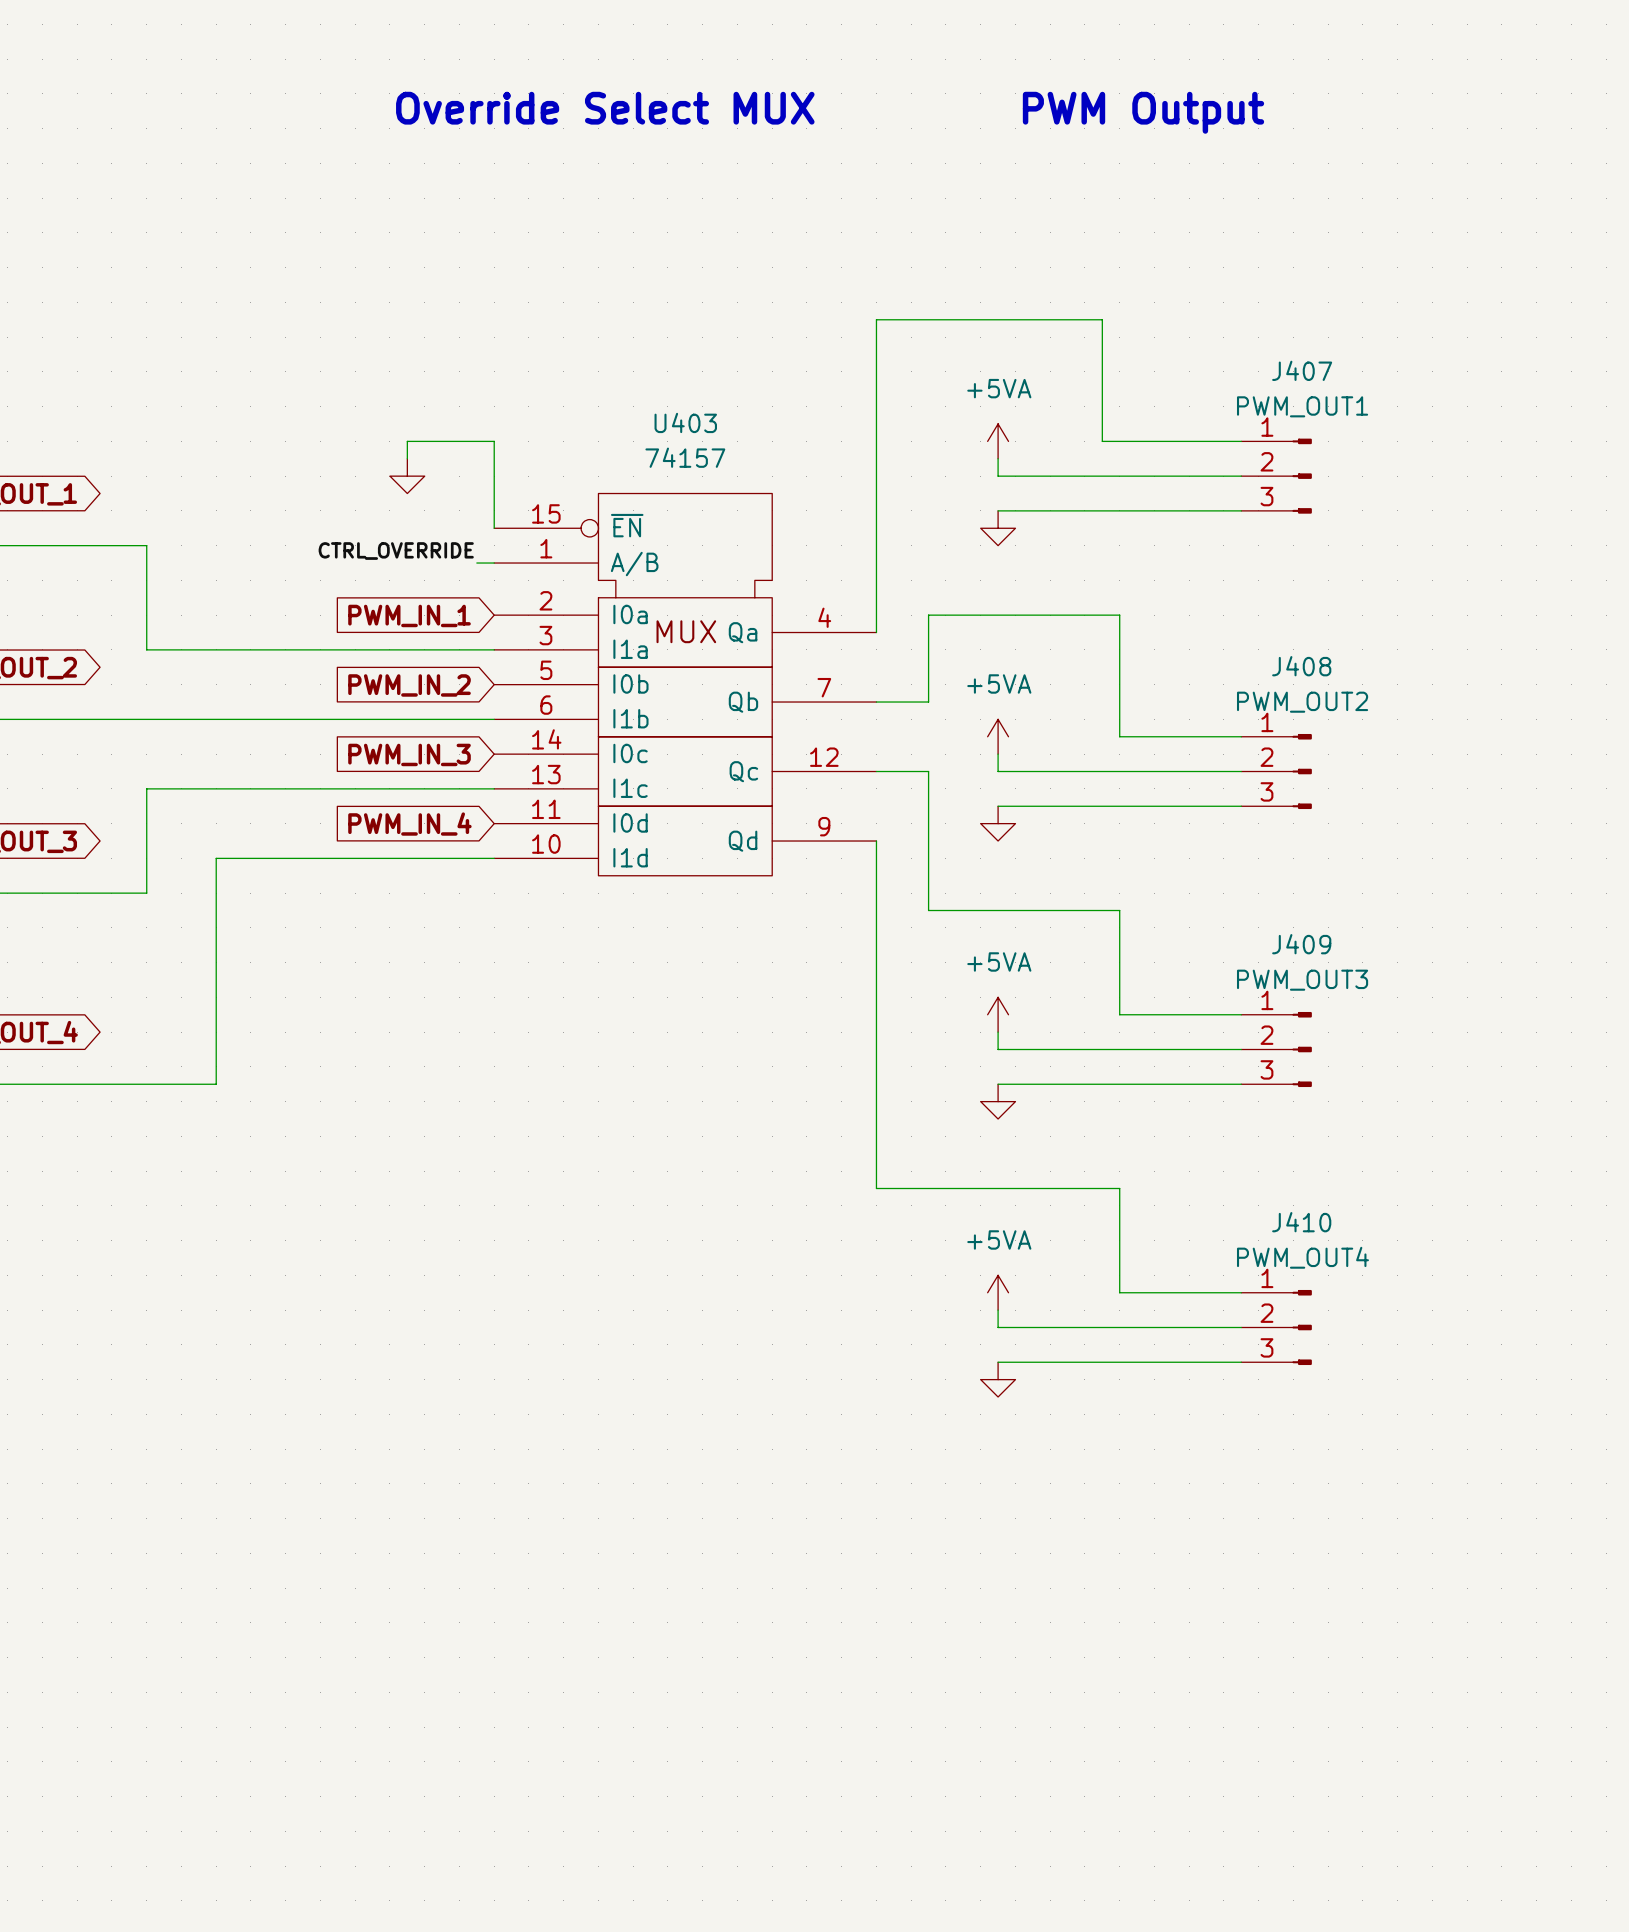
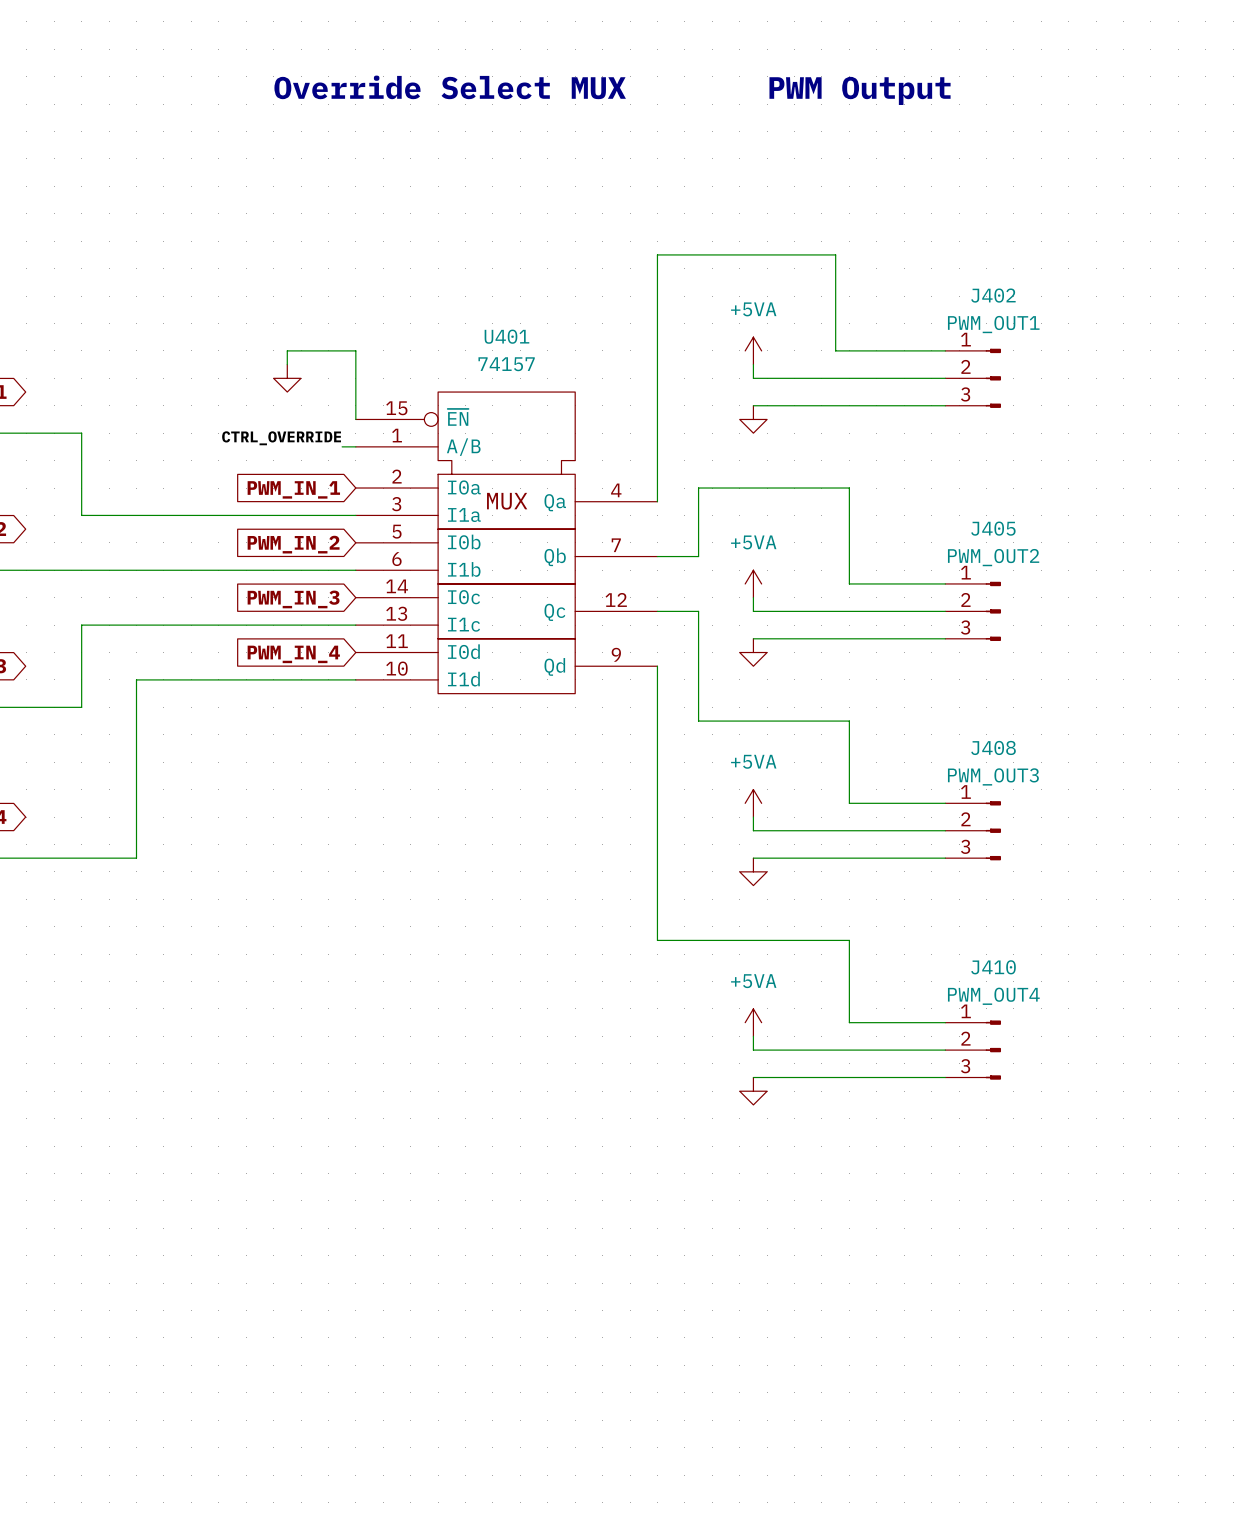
J407 name: J407 (1302, 370) -> J402 (993, 295)
U403 name: U403 (685, 422) -> U401 (506, 336)
J408 name: J408 (1301, 666) -> J405 (993, 528)
J409 name: J409 (1301, 944) -> J408 (993, 747)

